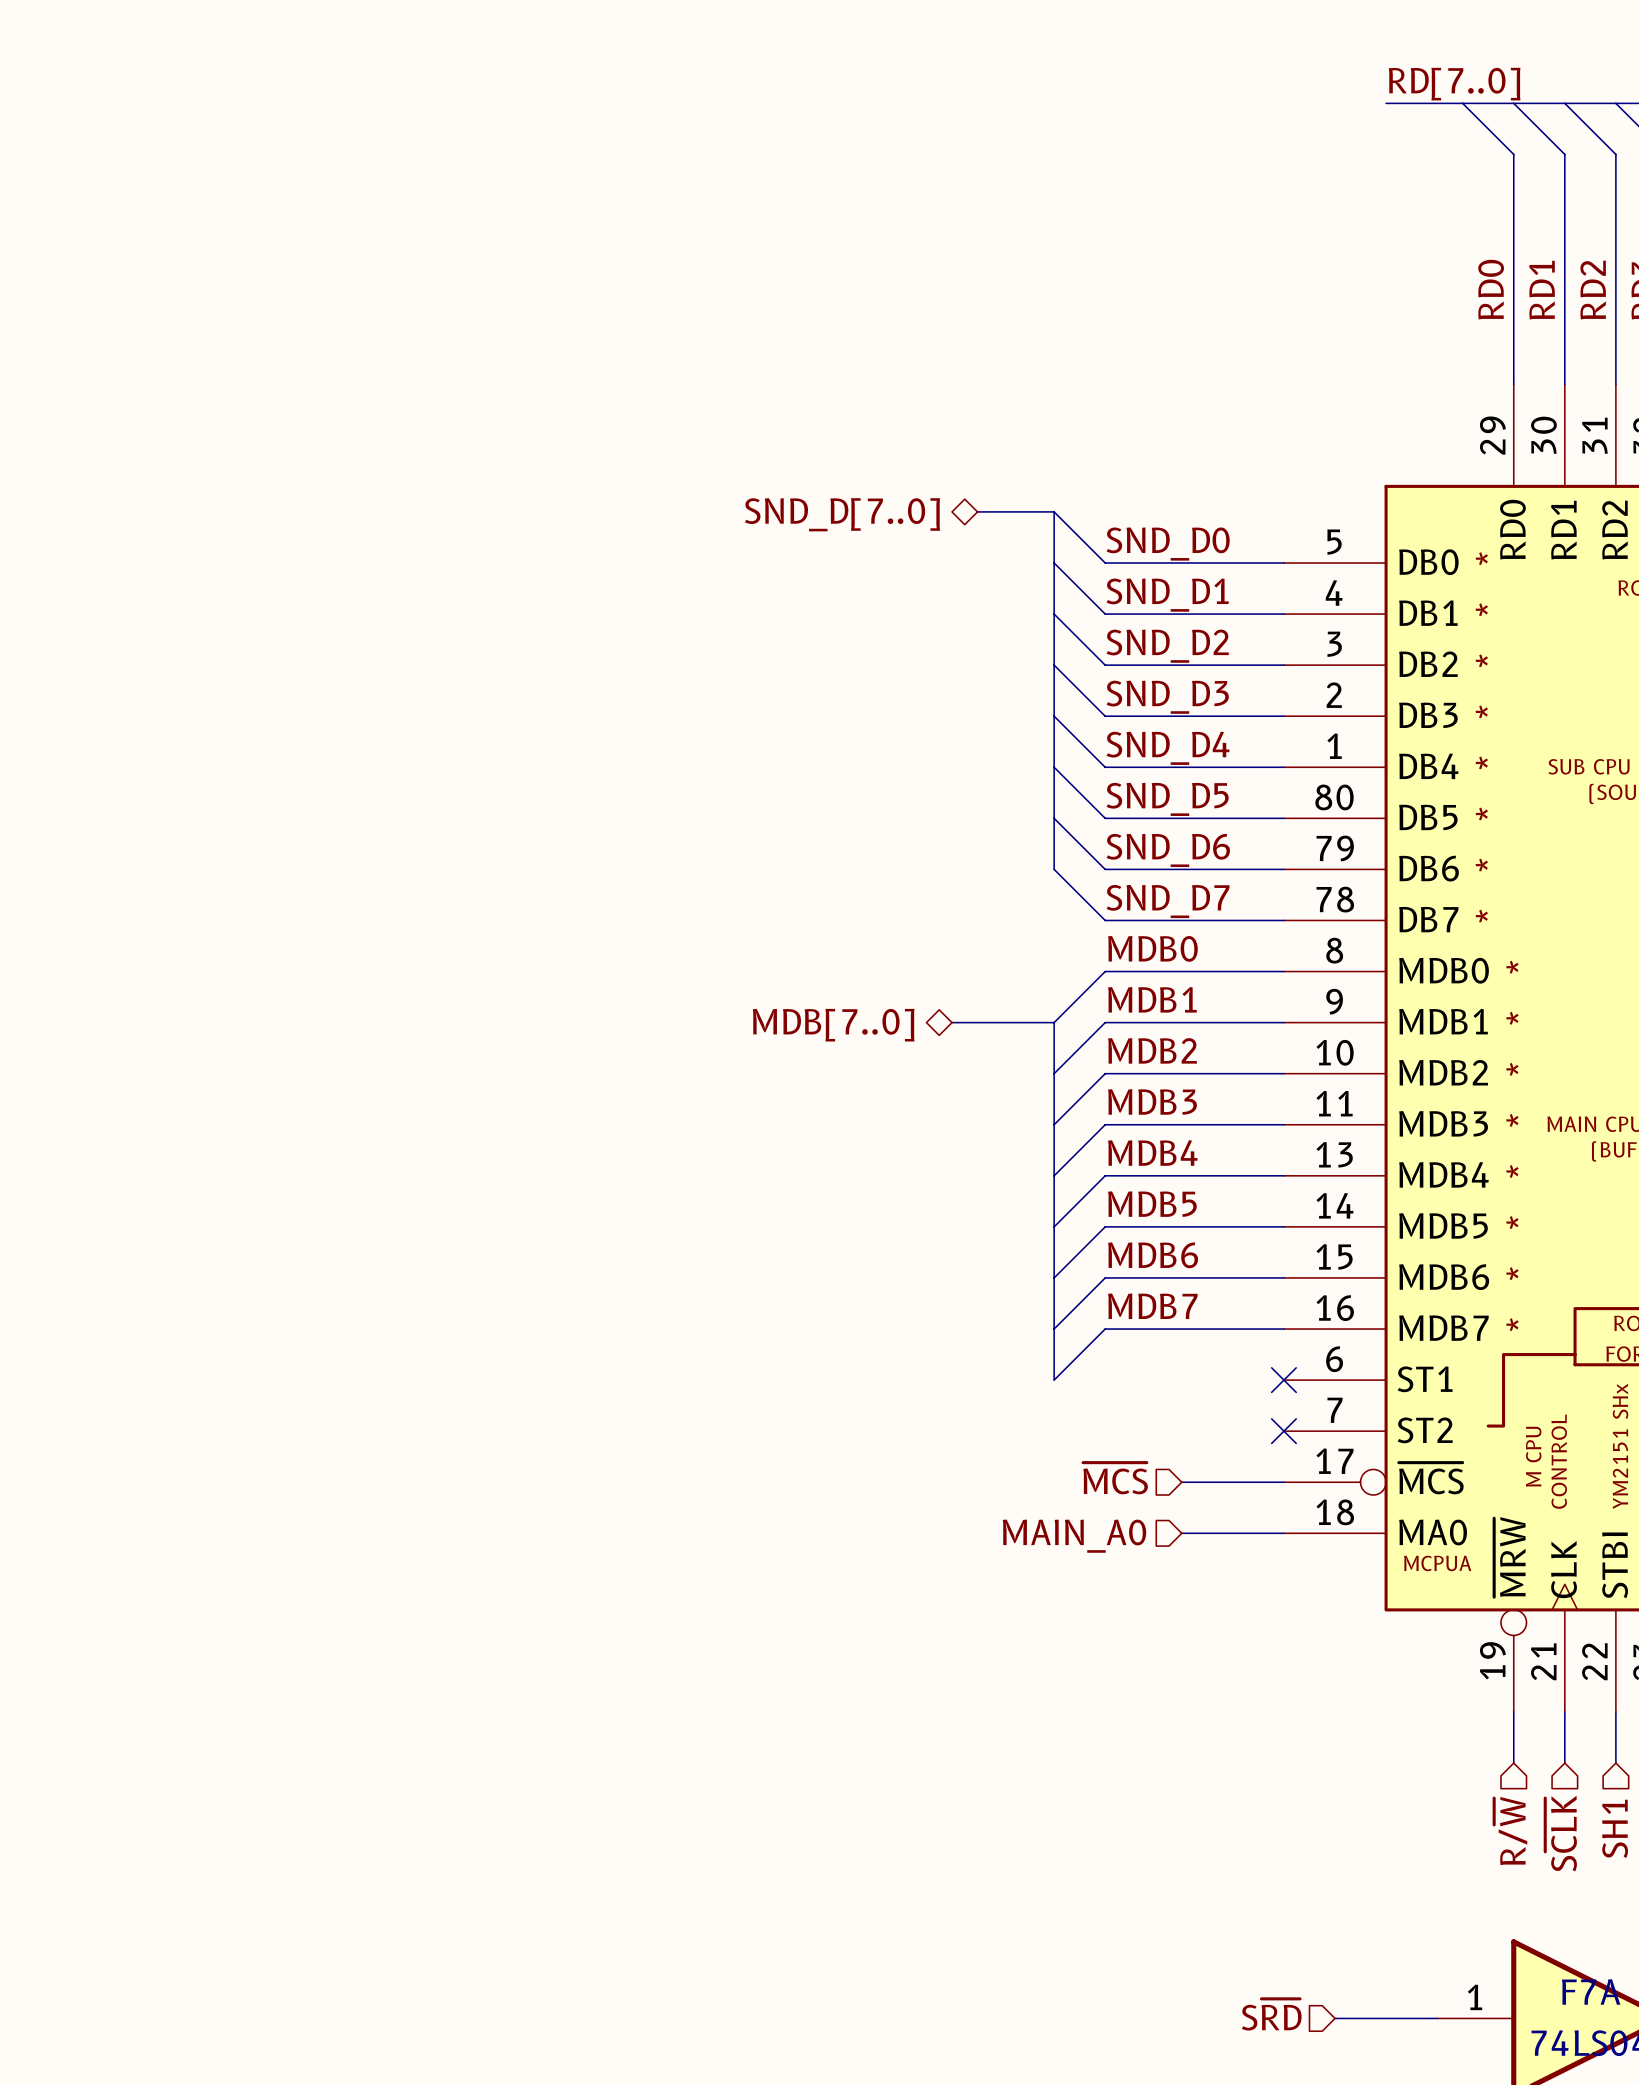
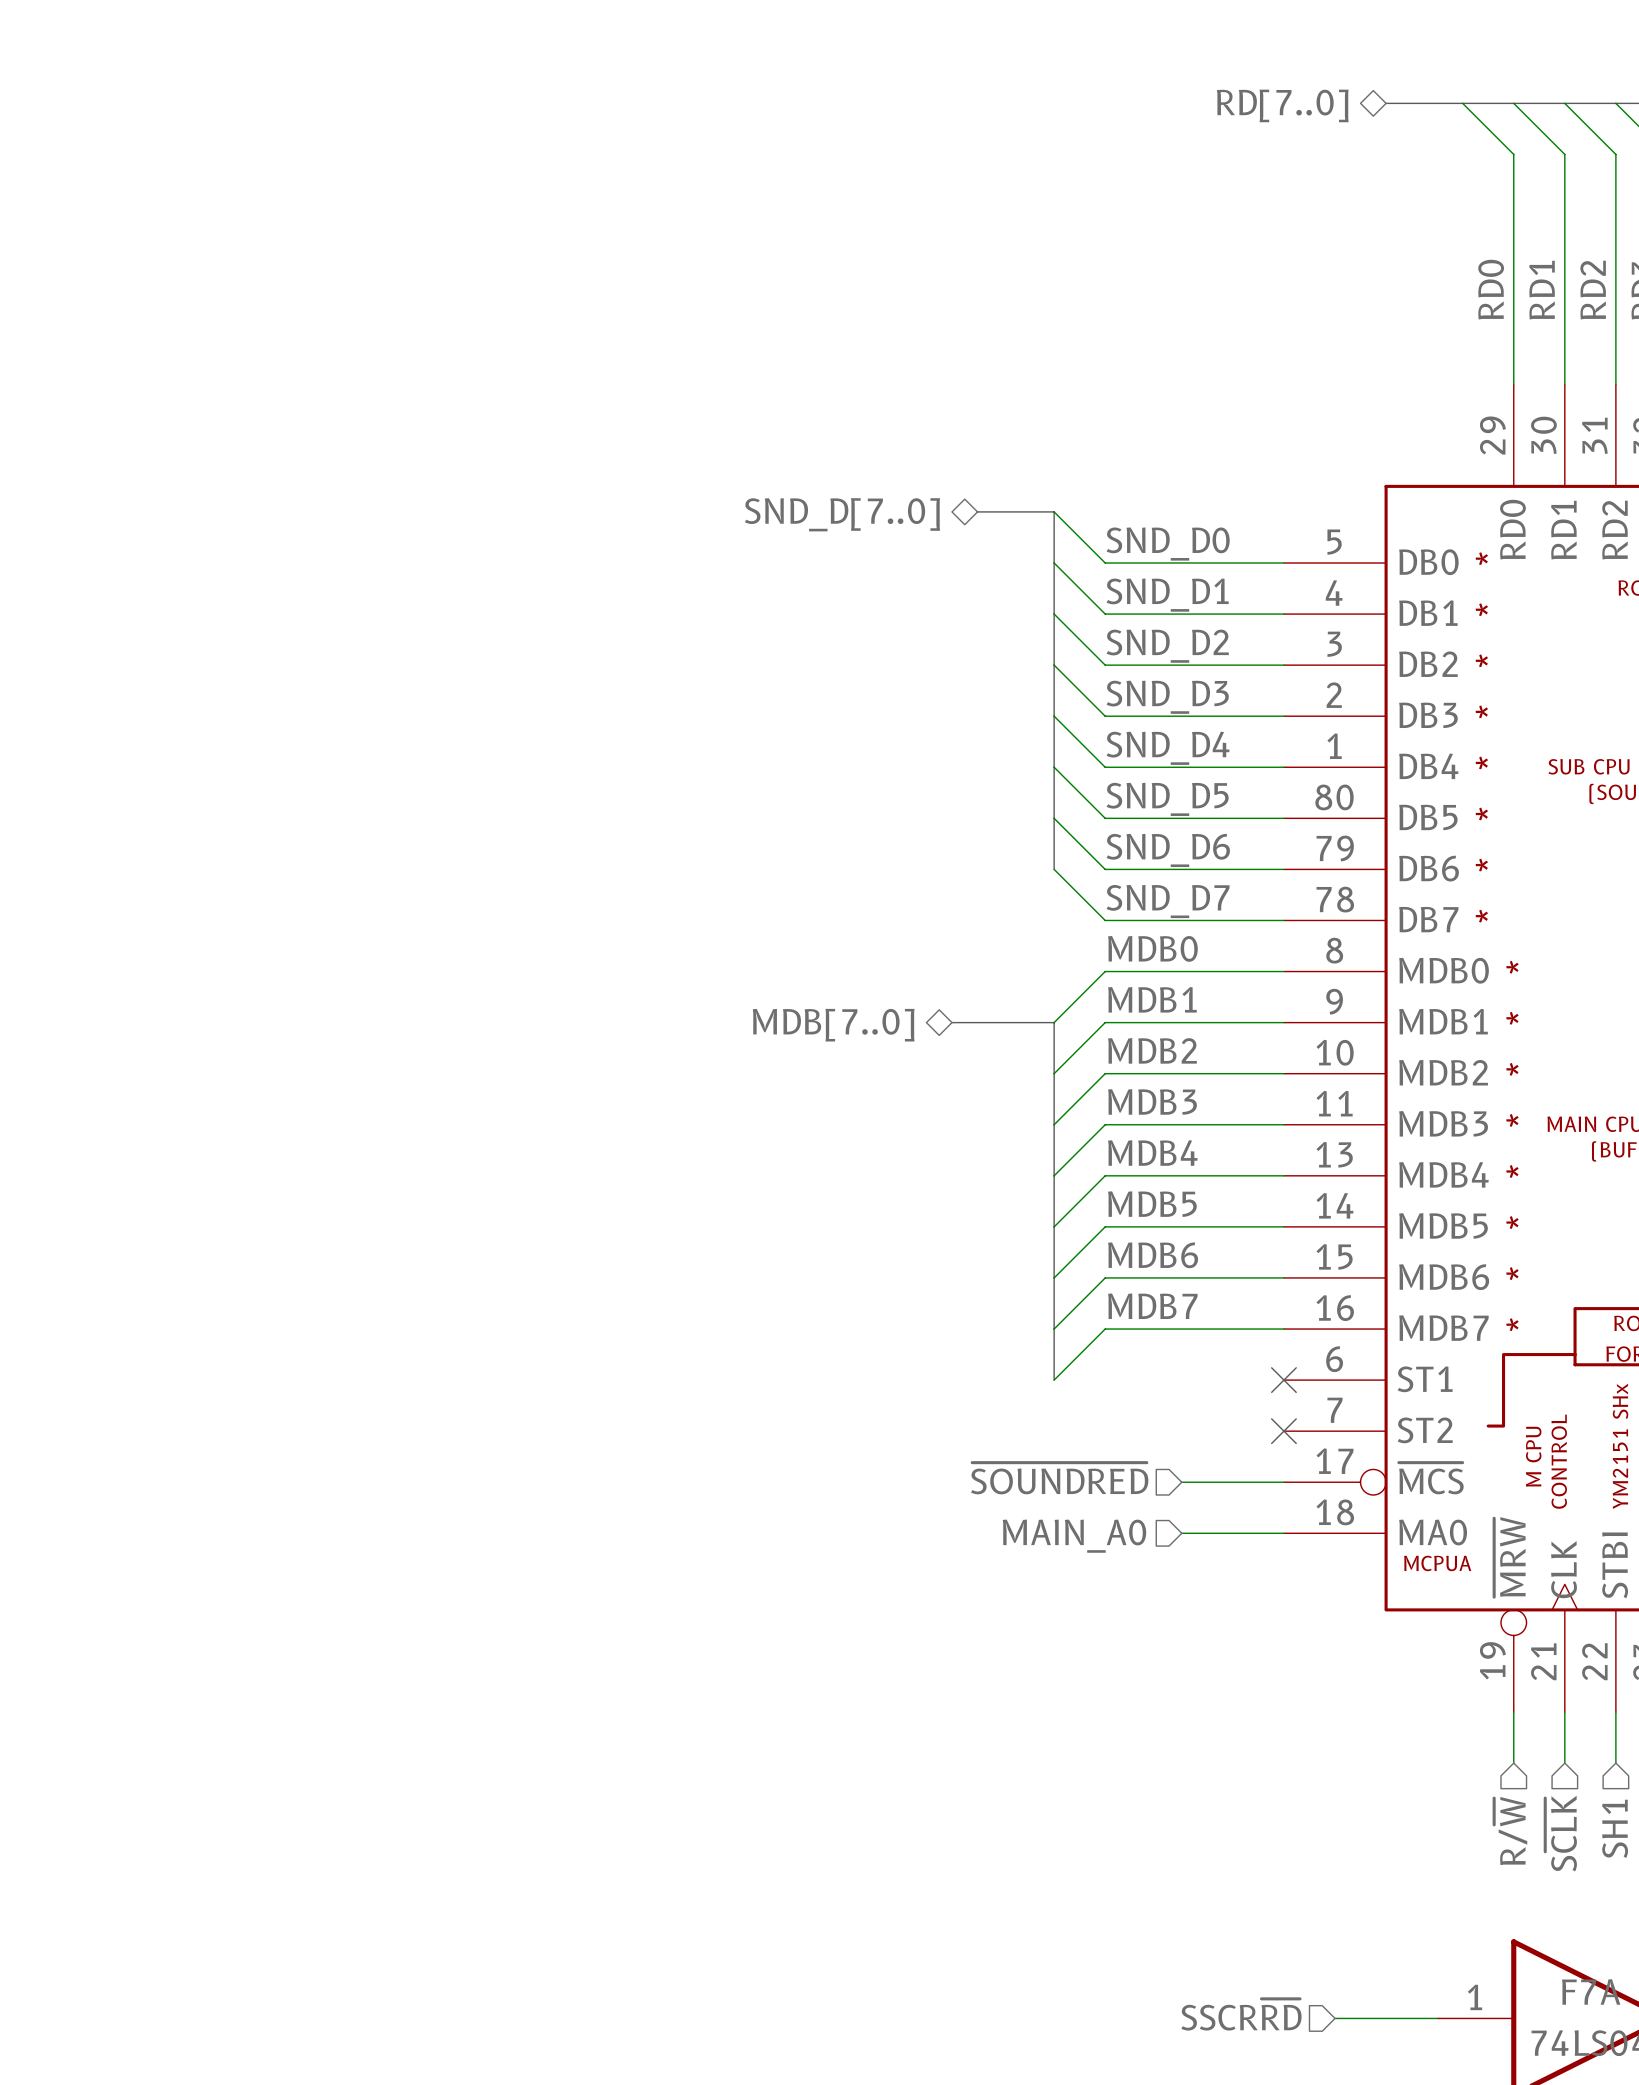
label: RD[7..0] (1454, 84) -> none
hierarchical label: none -> RD[7..0] (1282, 105)
hierarchical label: ~{MCS} (1115, 1478) -> ~{SOUNDRED} (1059, 1478)
hierarchical label: S~{RD} (1271, 2014) -> SSCR~{RD} (1241, 2014)

